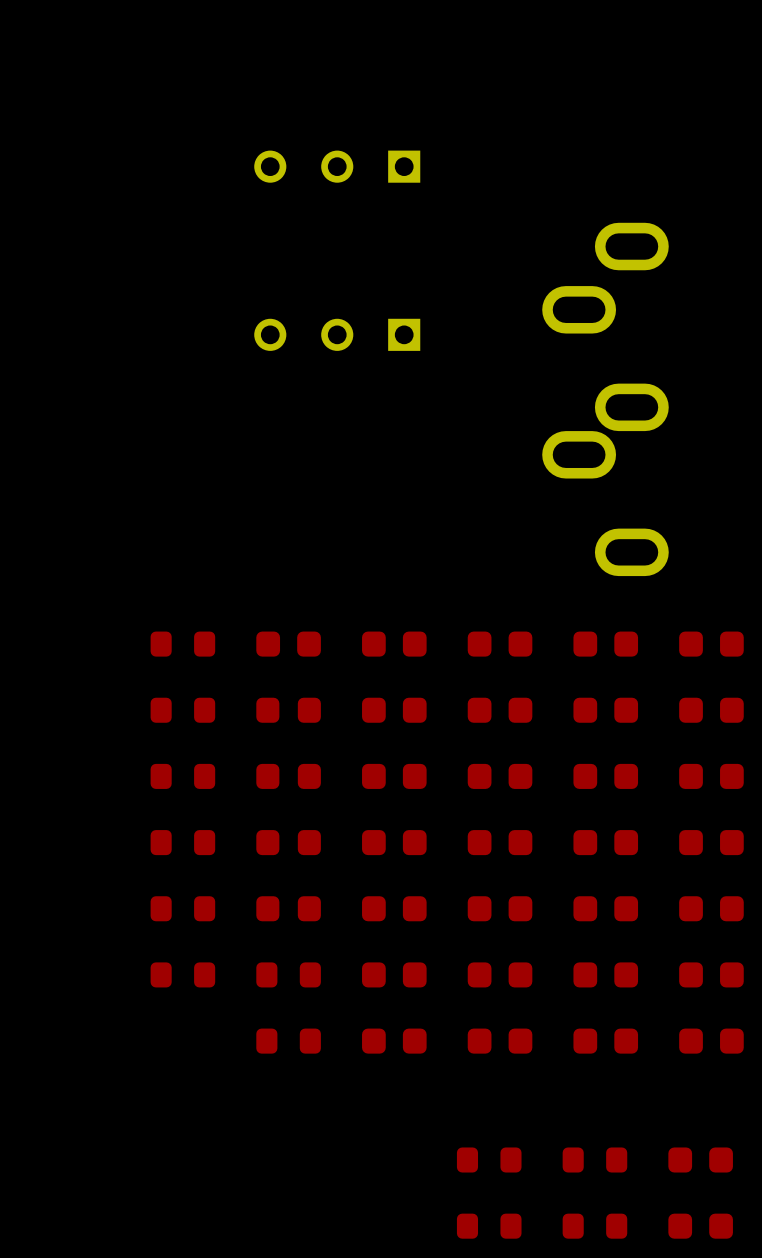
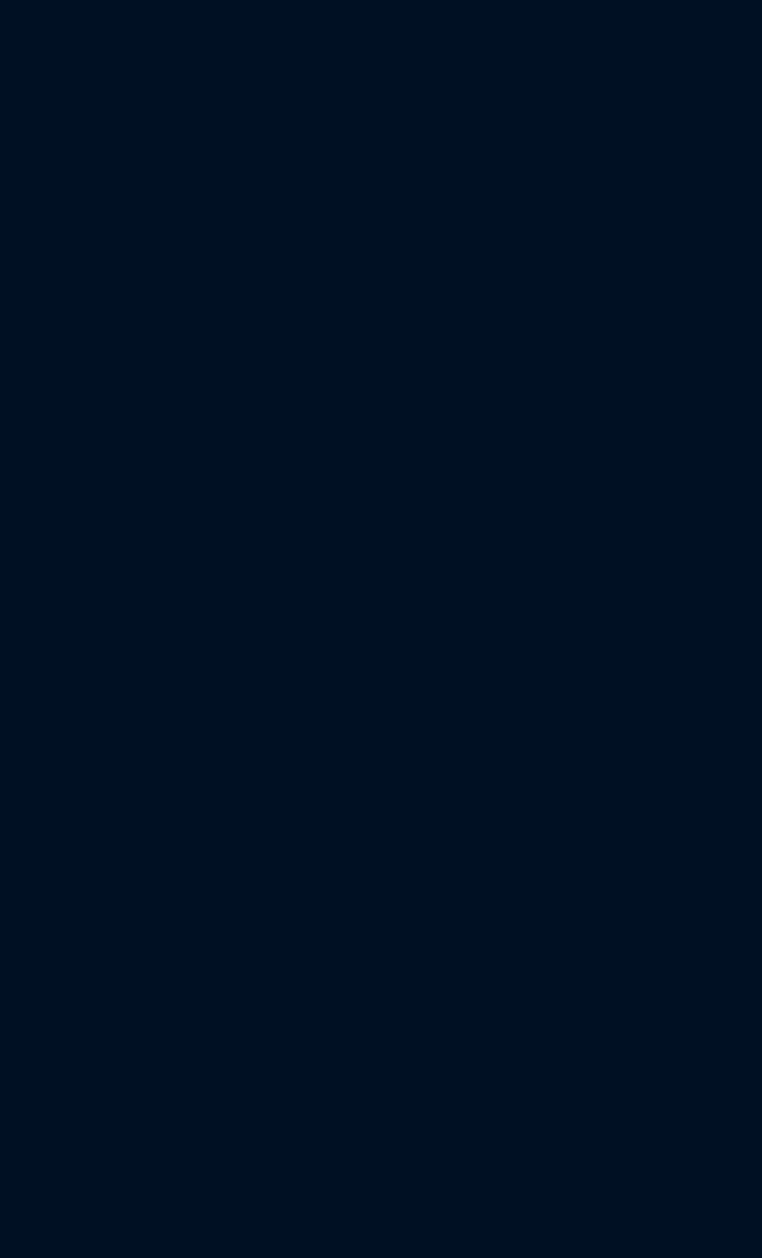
part: (337, 166) -> none
part: (337, 334) -> none
part: (605, 399) -> none
part: (182, 644) -> none
part: (288, 644) -> none
part: (394, 644) -> none
part: (500, 644) -> none
part: (605, 644) -> none
part: (711, 644) -> none
part: (182, 710) -> none
part: (288, 710) -> none
part: (394, 710) -> none
part: (500, 710) -> none
part: (605, 710) -> none
part: (711, 710) -> none
part: (182, 776) -> none
part: (288, 776) -> none
part: (394, 776) -> none
part: (500, 776) -> none
part: (605, 776) -> none
part: (711, 776) -> none
part: (182, 842) -> none
part: (288, 842) -> none
part: (394, 842) -> none
part: (500, 842) -> none
part: (605, 842) -> none
part: (711, 842) -> none
part: (182, 908) -> none
part: (288, 908) -> none
part: (394, 908) -> none
part: (500, 908) -> none
part: (605, 908) -> none
part: (711, 908) -> none
part: (182, 974) -> none
part: (288, 974) -> none
part: (394, 974) -> none
part: (500, 974) -> none
part: (605, 974) -> none
part: (711, 974) -> none
part: (288, 1041) -> none
part: (394, 1041) -> none
part: (500, 1041) -> none
part: (605, 1041) -> none
part: (711, 1041) -> none
part: (489, 1159) -> none
part: (594, 1159) -> none
part: (700, 1159) -> none
part: (489, 1226) -> none
part: (594, 1226) -> none
part: (700, 1226) -> none

